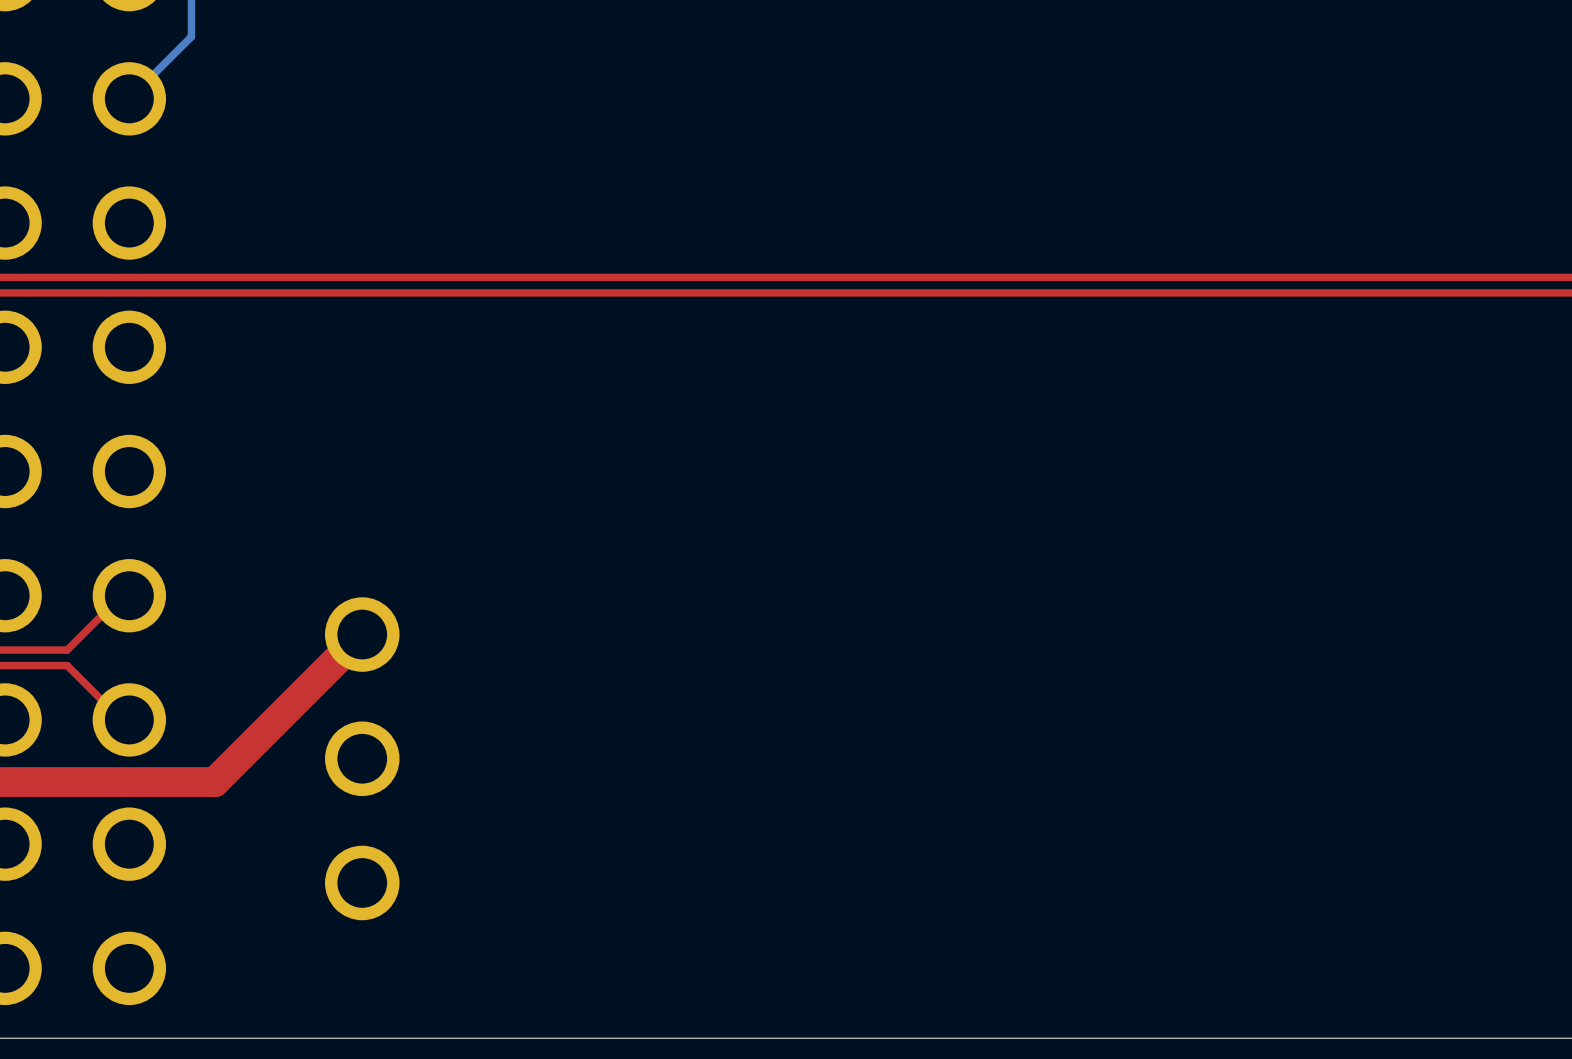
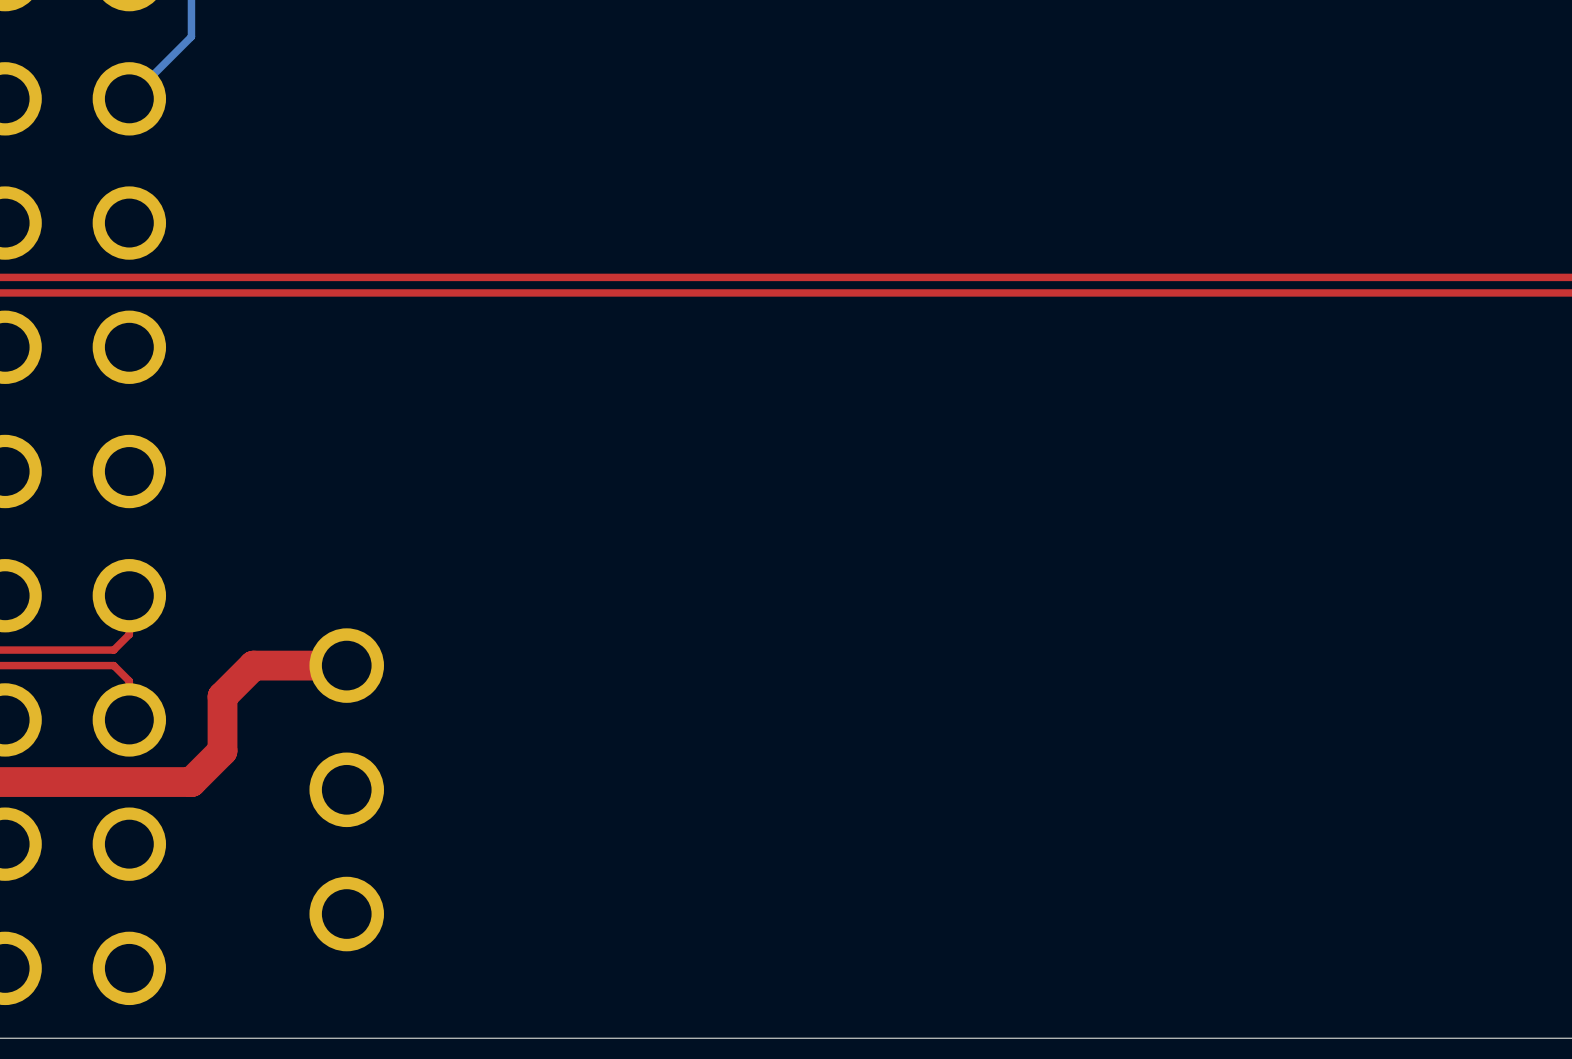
top track: (129, 595) (121, 595) (67, 650) -> (129, 595) (129, 634) (113, 650) (67, 650)
top track: (362, 634) (214, 782) (191, 782) -> (346, 665) (253, 665) (222, 696) (222, 750) (191, 782)
top track: (67, 665) (121, 719) (129, 719) -> (67, 665) (113, 665) (129, 681) (129, 719)
part position: (362, 758) -> (346, 789)

